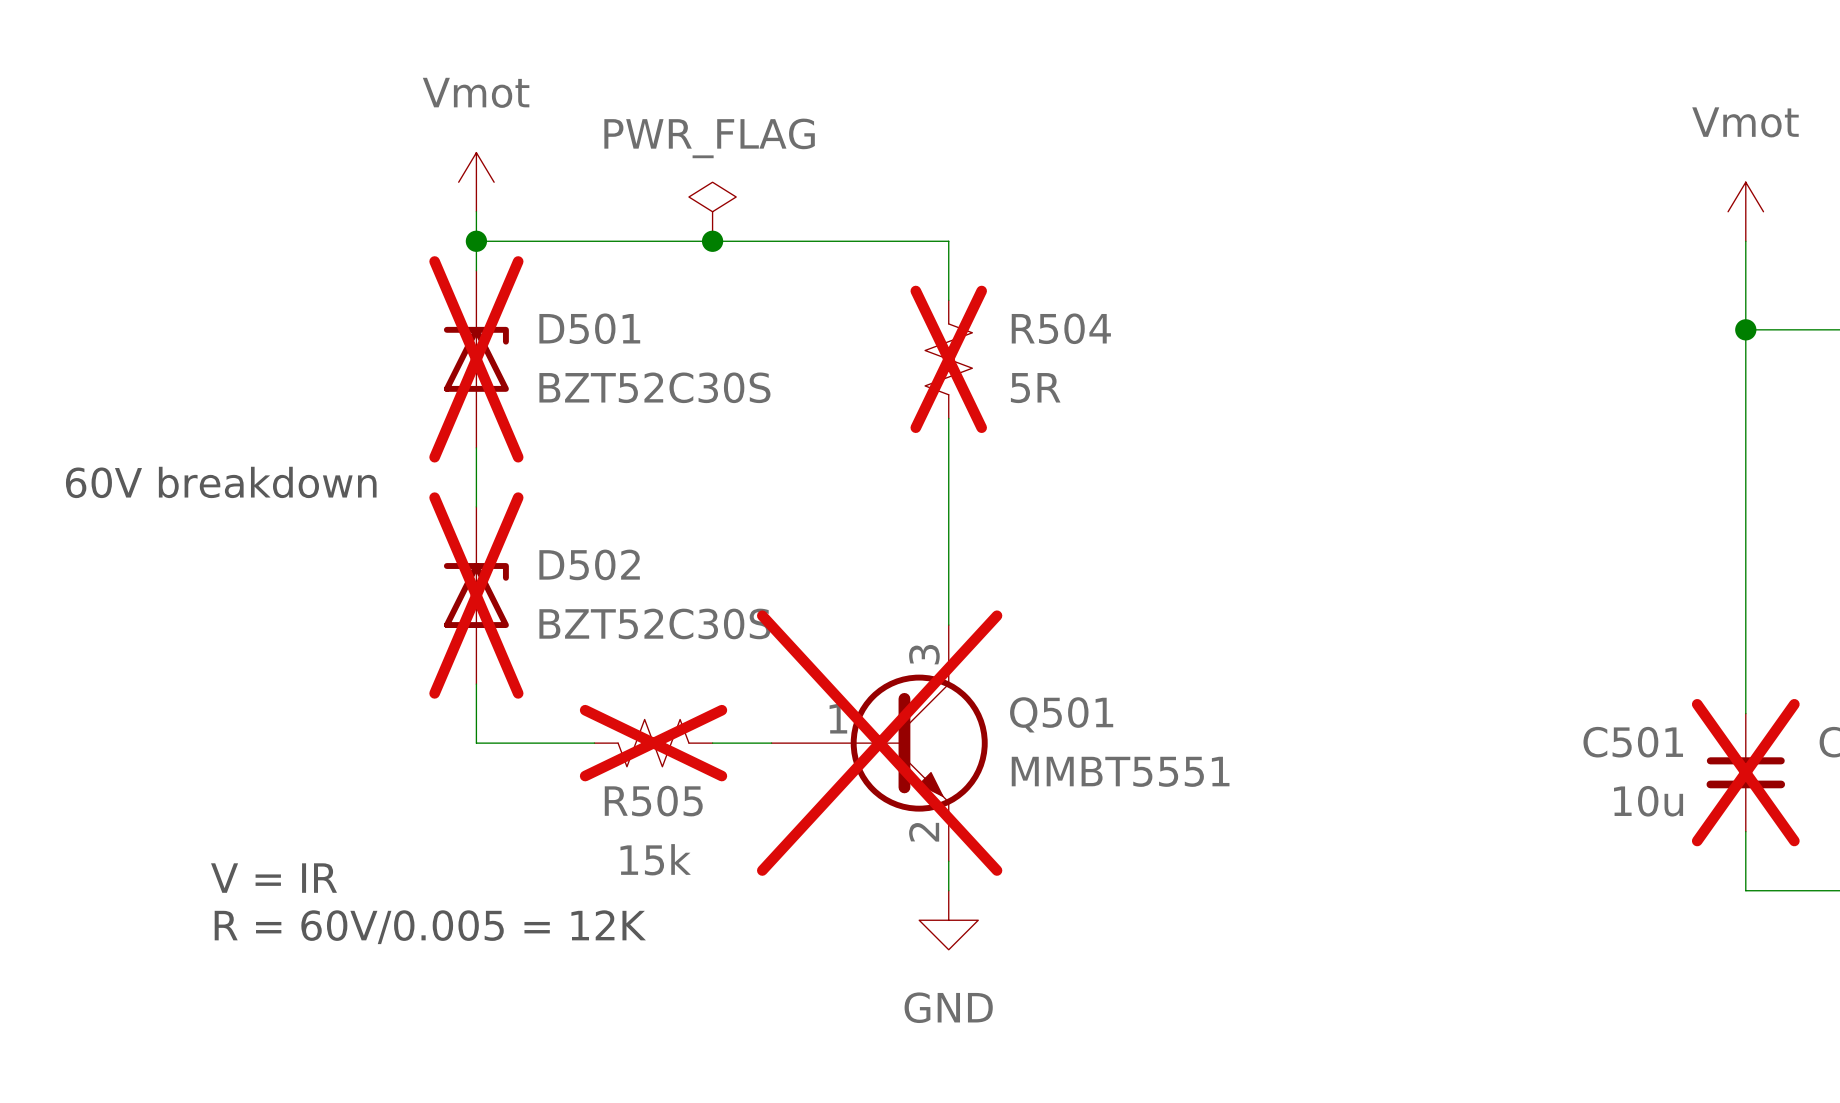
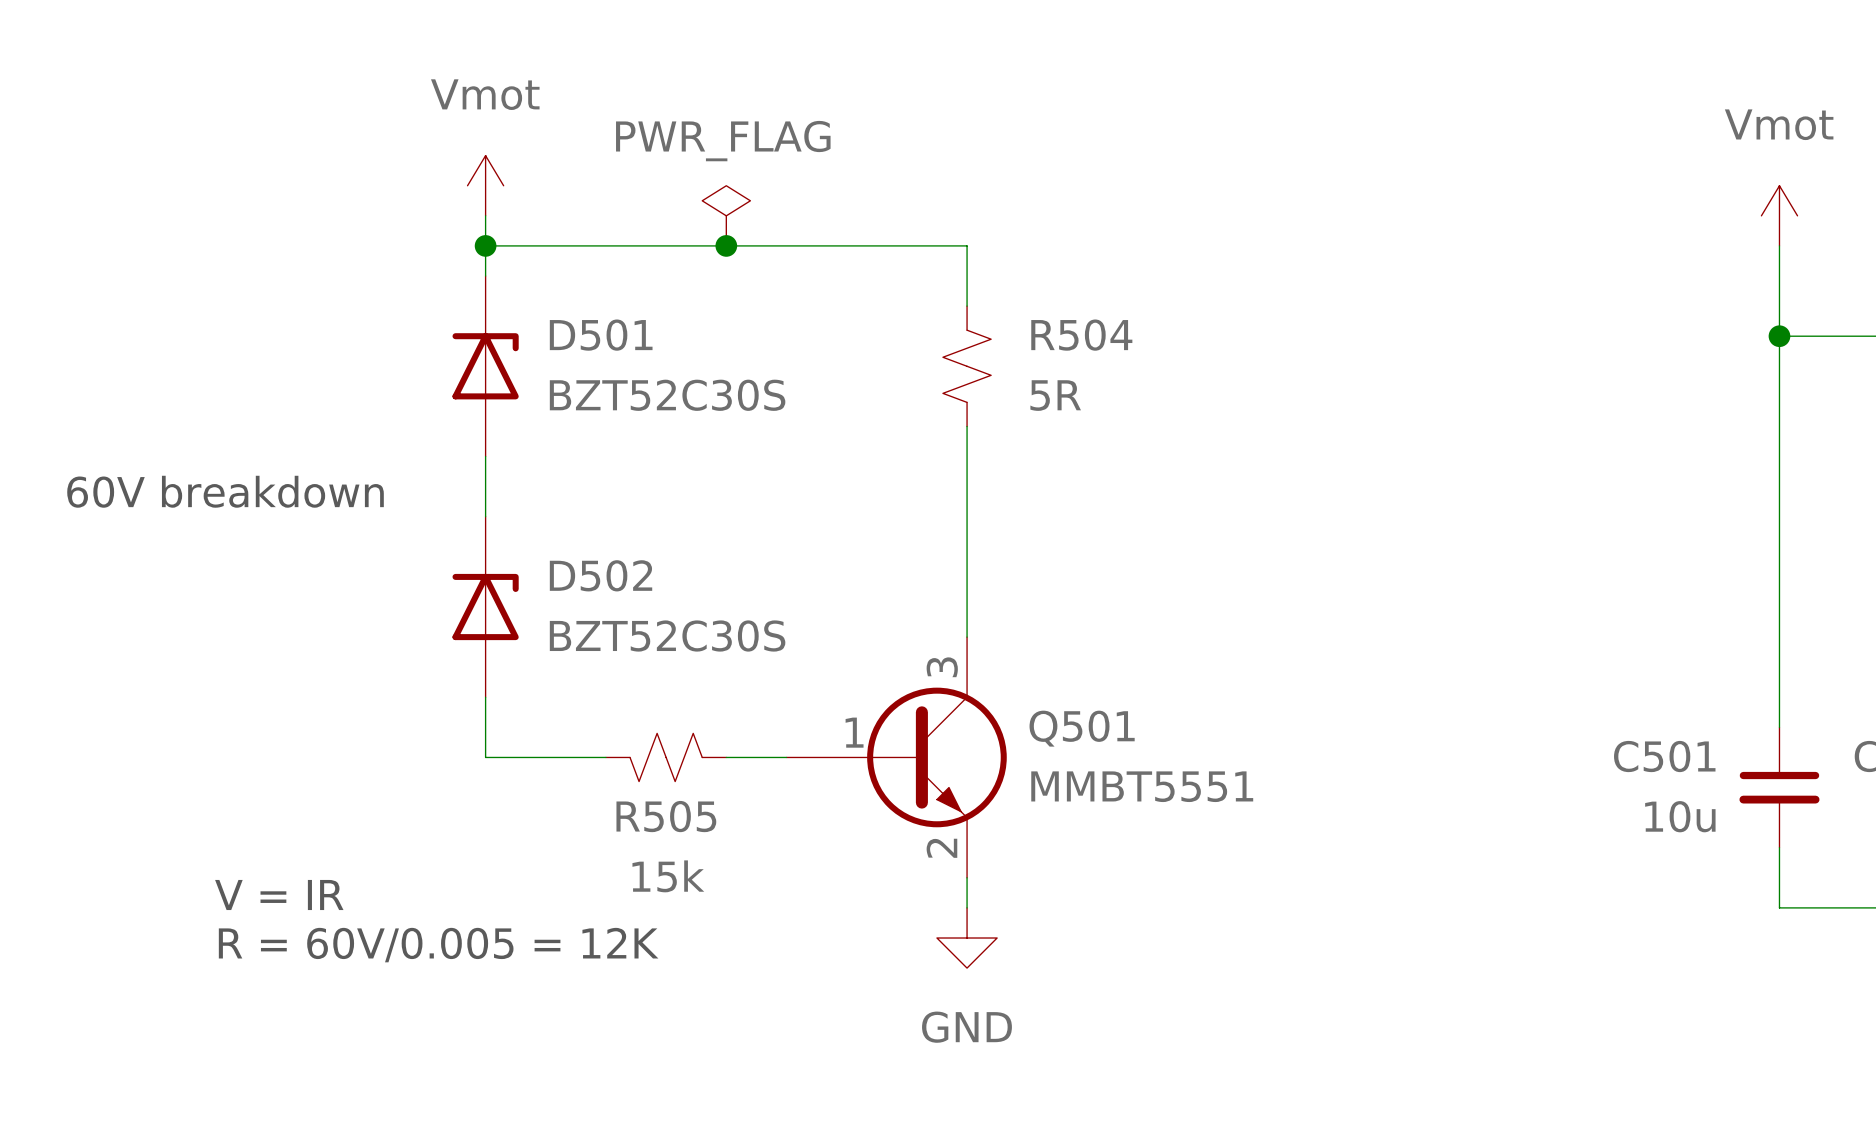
D501 do-not-place cross: (476, 359) -> none
R504 do-not-place cross: (948, 359) -> none
D502 do-not-place cross: (476, 595) -> none
R505 do-not-place cross: (653, 743) -> none
Q501 do-not-place cross: (879, 743) -> none
C501 do-not-place cross: (1745, 772) -> none

